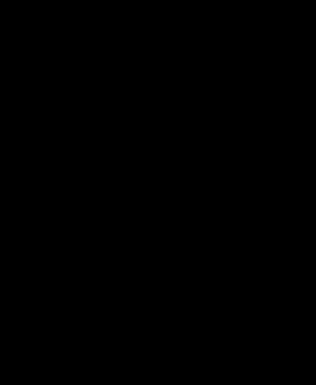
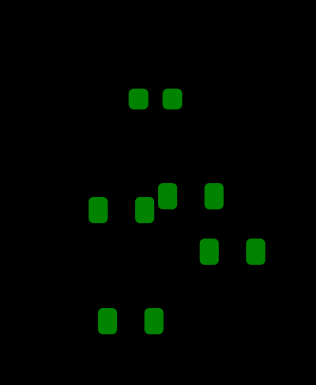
part: none -> (155, 99)
part: none -> (190, 196)
part: none -> (121, 210)
part: none -> (232, 251)
part: none -> (130, 321)

